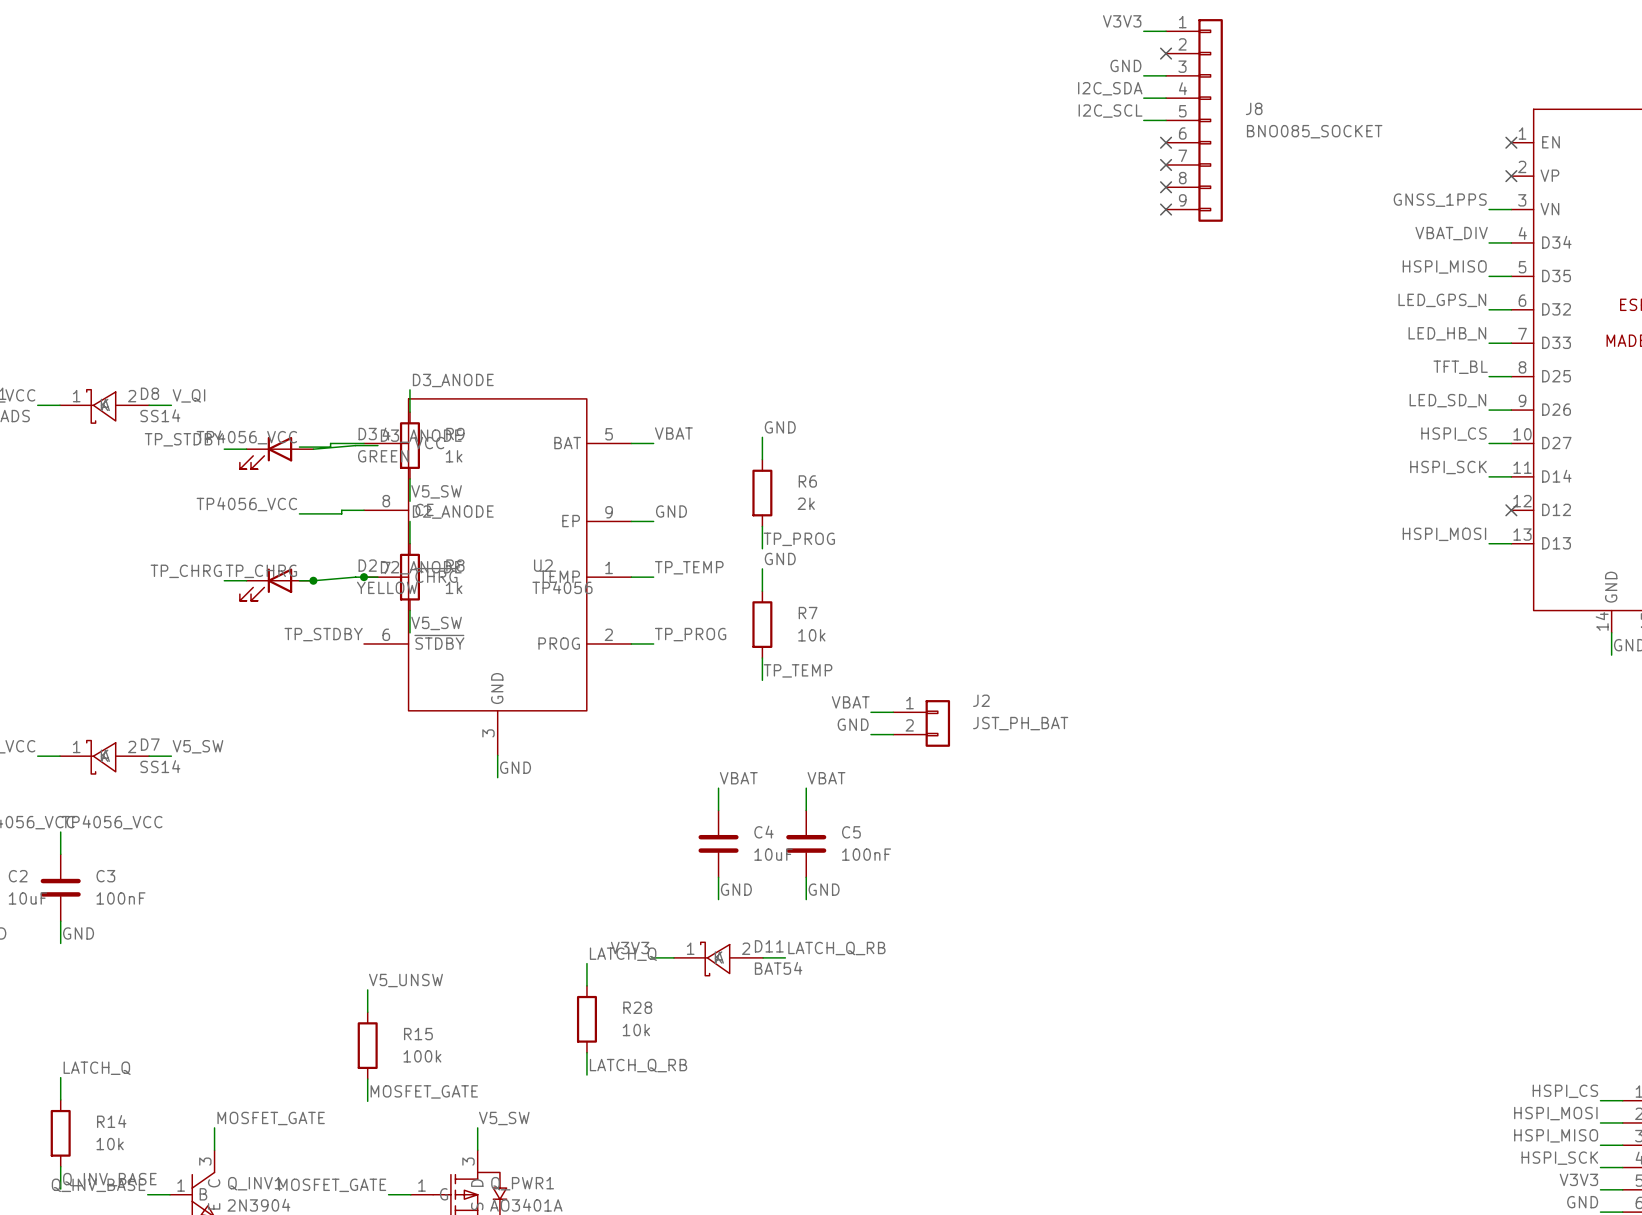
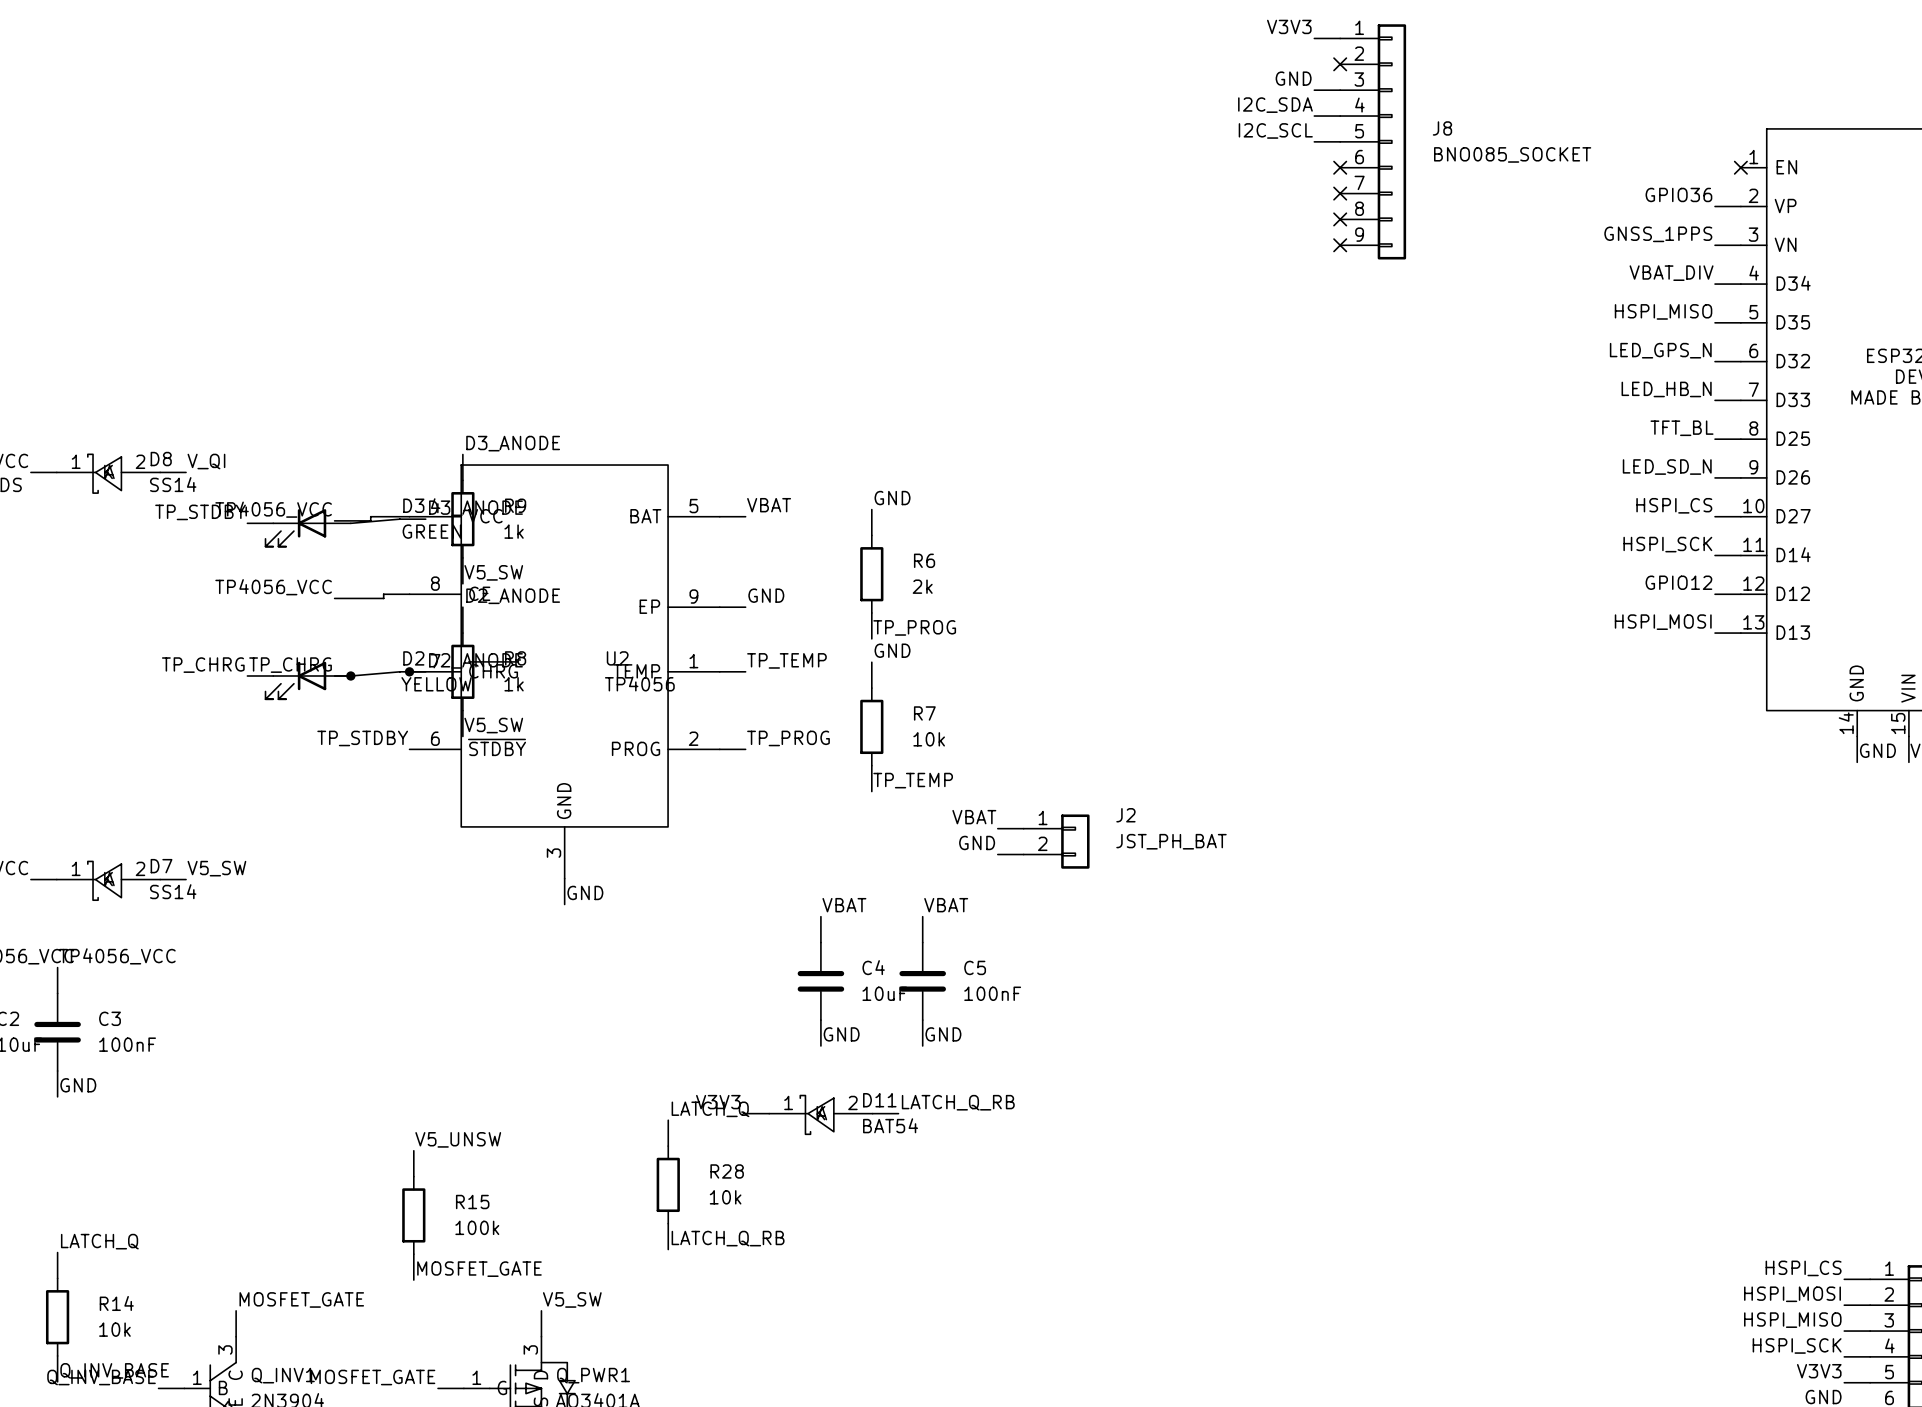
label: none -> GPIO36 (1678, 194)
wire: none -> (1715, 206) (1740, 206)
no-connect mark: (1511, 176) -> none
label: none -> GPIO12 (1678, 582)
wire: none -> (1715, 594) (1740, 594)
no-connect mark: (1511, 510) -> none

